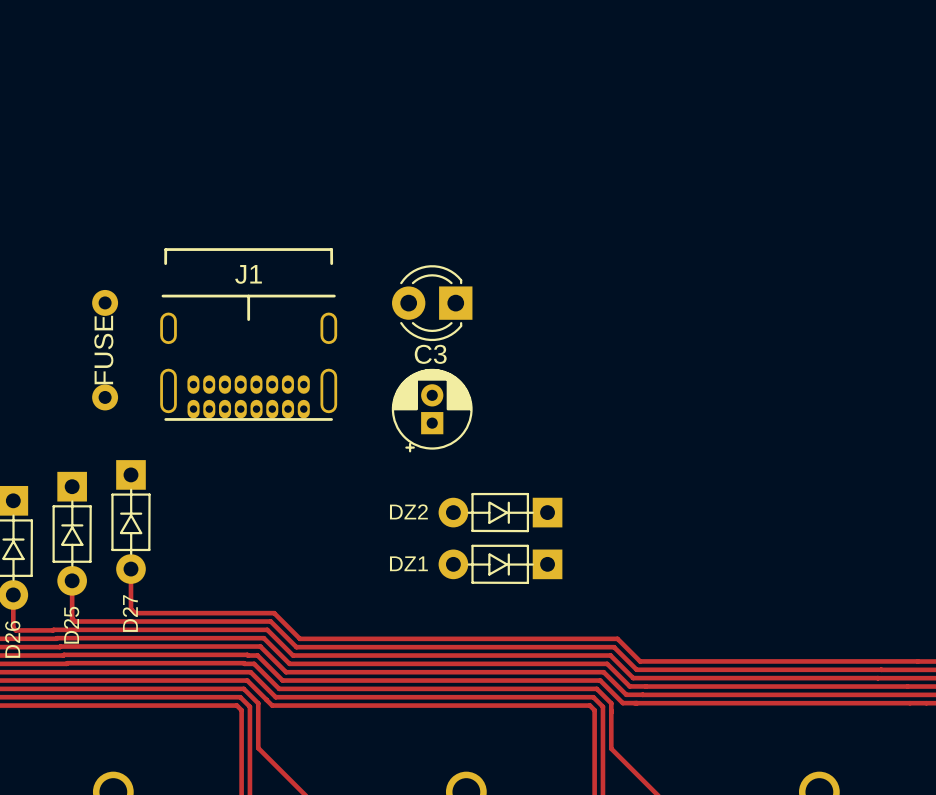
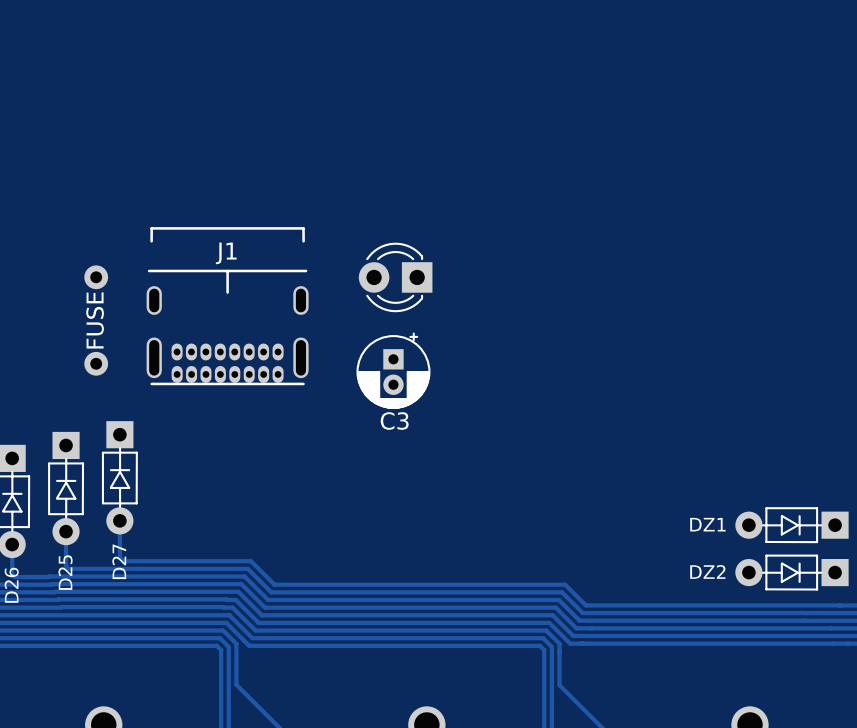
C3 rotation: 0° (432, 410) -> 180° (393, 370)
DZ2 position: (500, 512) -> (791, 572)
DZ1 position: (500, 564) -> (791, 525)

